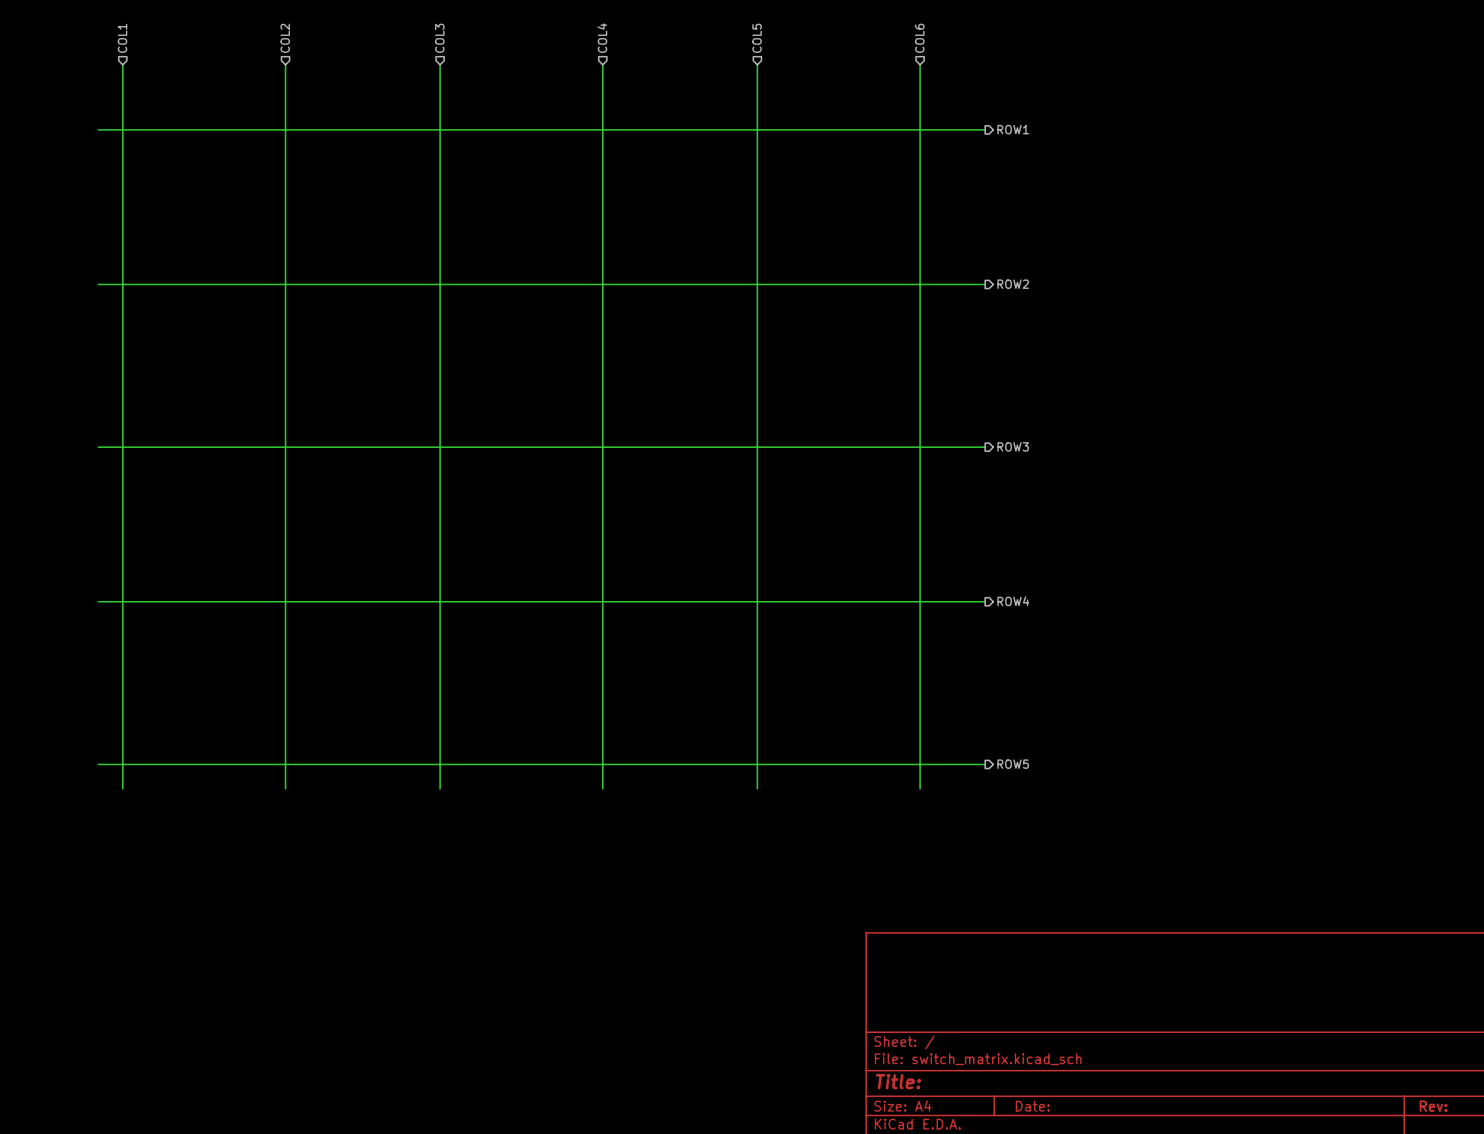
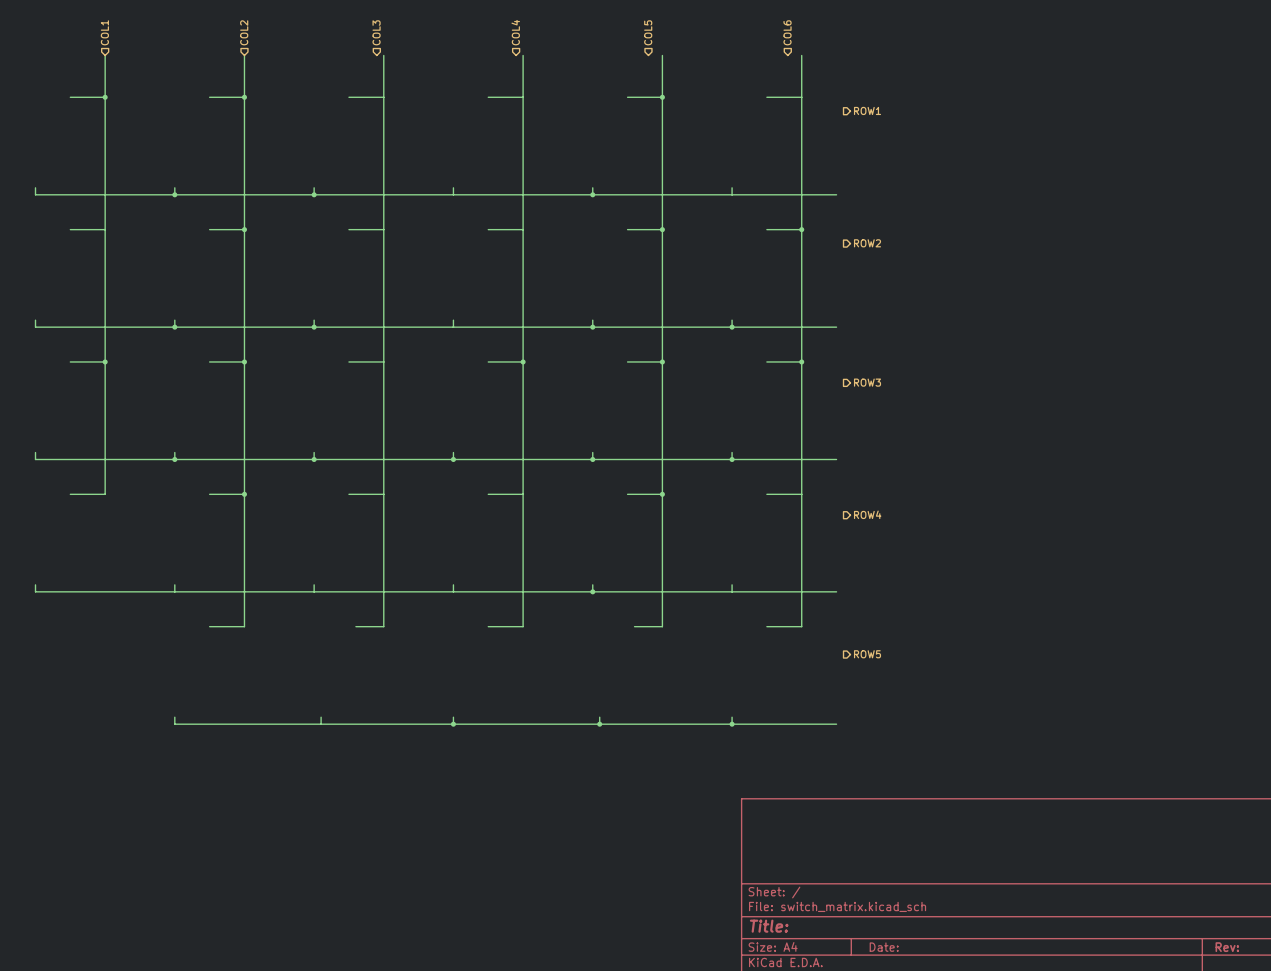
wire: (440, 64) (440, 788) -> none
wire: none -> (383, 55) (383, 626) (355, 626)
wire: (602, 64) (602, 788) -> none
wire: none -> (523, 55) (523, 626) (488, 626)
wire: (757, 64) (757, 788) -> none
wire: none -> (662, 55) (662, 626) (634, 626)
wire: (920, 64) (920, 788) -> none
wire: none -> (801, 55) (801, 626) (766, 626)
wire: none -> (70, 97) (105, 97)
junction: none -> (105, 97)
wire: none -> (209, 97) (244, 97)
junction: none -> (244, 97)
wire: none -> (348, 97) (383, 97)
wire: none -> (488, 97) (523, 97)
wire: none -> (627, 97) (662, 97)
junction: none -> (662, 97)
wire: none -> (766, 97) (801, 97)
wire: (98, 129) (985, 129) -> none
wire: none -> (35, 187) (35, 194) (836, 194)
wire: none -> (174, 187) (174, 194)
wire: none -> (314, 187) (314, 194)
wire: none -> (453, 187) (453, 194)
wire: none -> (592, 187) (592, 194)
wire: none -> (732, 187) (732, 194)
junction: none -> (174, 194)
junction: none -> (314, 194)
junction: none -> (592, 194)
wire: none -> (70, 229) (105, 229)
wire: none -> (209, 229) (244, 229)
junction: none -> (244, 229)
wire: none -> (348, 229) (383, 229)
wire: none -> (488, 229) (523, 229)
wire: none -> (627, 229) (662, 229)
junction: none -> (662, 229)
wire: none -> (766, 229) (801, 229)
junction: none -> (801, 229)
wire: (98, 284) (985, 284) -> none
wire: none -> (35, 320) (35, 327) (836, 327)
wire: none -> (174, 320) (174, 327)
wire: none -> (314, 320) (314, 327)
wire: none -> (453, 320) (453, 327)
wire: none -> (592, 320) (592, 327)
wire: none -> (732, 320) (732, 327)
junction: none -> (174, 327)
junction: none -> (314, 327)
junction: none -> (592, 327)
junction: none -> (732, 327)
wire: none -> (70, 361) (105, 361)
junction: none -> (105, 361)
wire: none -> (209, 361) (244, 361)
junction: none -> (244, 361)
wire: none -> (348, 361) (383, 361)
wire: none -> (488, 361) (523, 361)
junction: none -> (523, 361)
wire: none -> (627, 361) (662, 361)
junction: none -> (662, 361)
wire: none -> (766, 361) (801, 361)
junction: none -> (801, 361)
wire: (98, 447) (985, 447) -> none
wire: none -> (35, 452) (35, 459) (836, 459)
wire: none -> (174, 452) (174, 459)
wire: none -> (314, 452) (314, 459)
wire: none -> (453, 452) (453, 459)
wire: none -> (592, 452) (592, 459)
wire: none -> (732, 452) (732, 459)
junction: none -> (174, 459)
junction: none -> (314, 459)
junction: none -> (453, 459)
junction: none -> (592, 459)
junction: none -> (732, 459)
wire: (122, 577) (122, 788) -> (105, 494) (70, 494)
wire: none -> (209, 494) (244, 494)
junction: none -> (244, 494)
wire: none -> (348, 494) (383, 494)
wire: none -> (488, 494) (523, 494)
wire: none -> (627, 494) (662, 494)
junction: none -> (662, 494)
wire: none -> (766, 494) (801, 494)
wire: (98, 601) (985, 601) -> none
wire: none -> (35, 584) (35, 591) (836, 591)
wire: none -> (174, 584) (174, 591)
wire: none -> (314, 584) (314, 591)
wire: none -> (453, 584) (453, 591)
wire: none -> (592, 584) (592, 591)
wire: none -> (732, 584) (732, 591)
junction: none -> (592, 591)
wire: (285, 731) (285, 788) -> (244, 626) (209, 626)
wire: (98, 764) (985, 764) -> none
wire: none -> (174, 717) (174, 724) (836, 724)
wire: none -> (321, 717) (321, 724)
wire: none -> (453, 717) (453, 724)
wire: none -> (599, 717) (599, 724)
wire: none -> (732, 717) (732, 724)
junction: none -> (453, 724)
junction: none -> (599, 724)
junction: none -> (732, 724)

